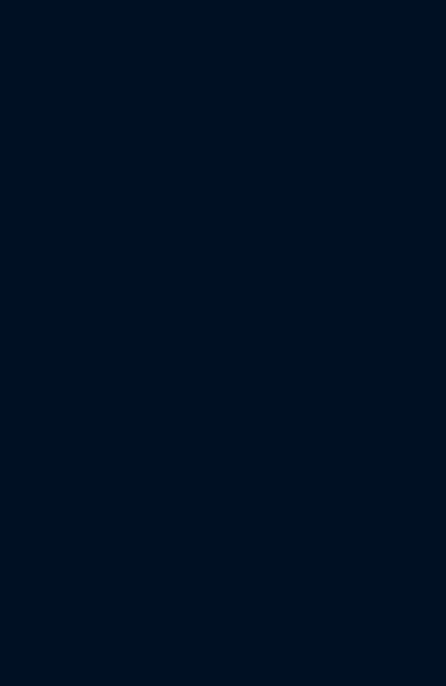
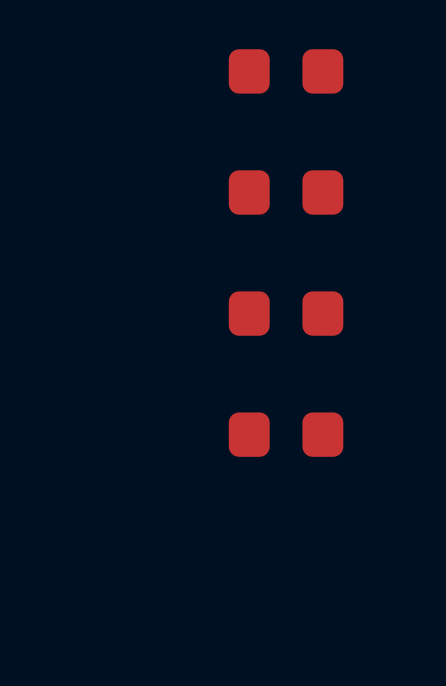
part: none -> (286, 71)
part: none -> (286, 192)
part: none -> (286, 313)
part: none -> (286, 434)

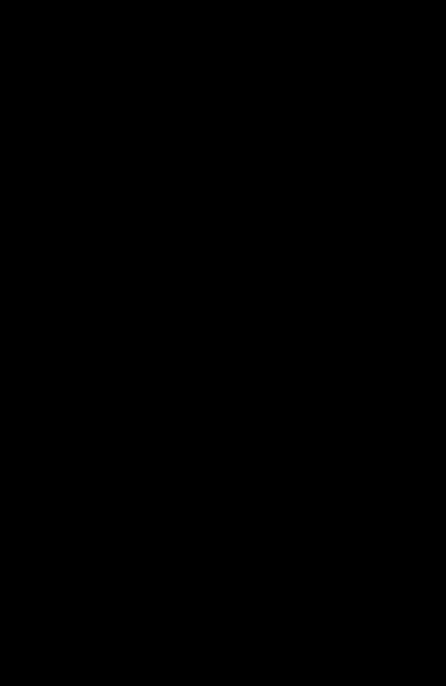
part: (286, 71) -> none
part: (286, 192) -> none
part: (286, 313) -> none
part: (286, 434) -> none

